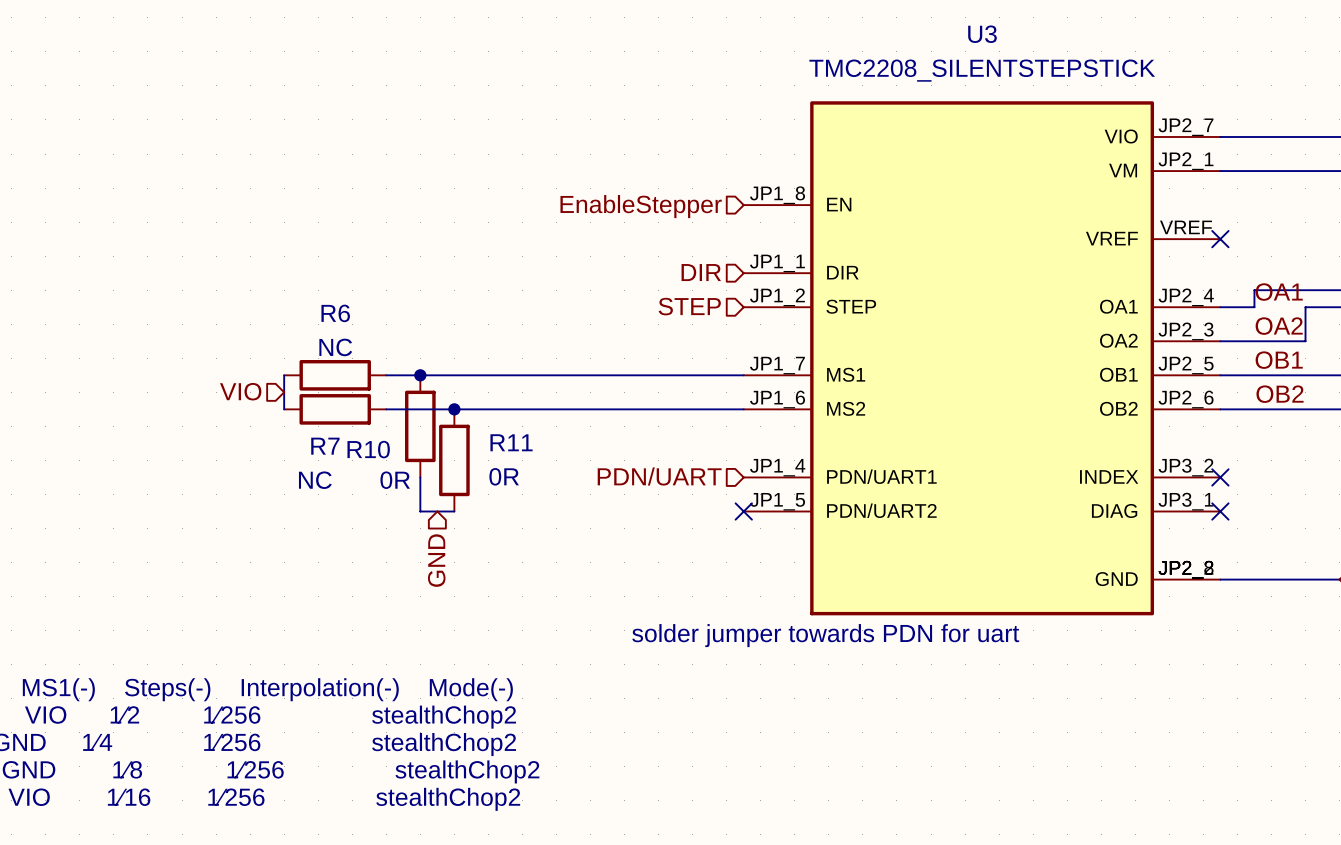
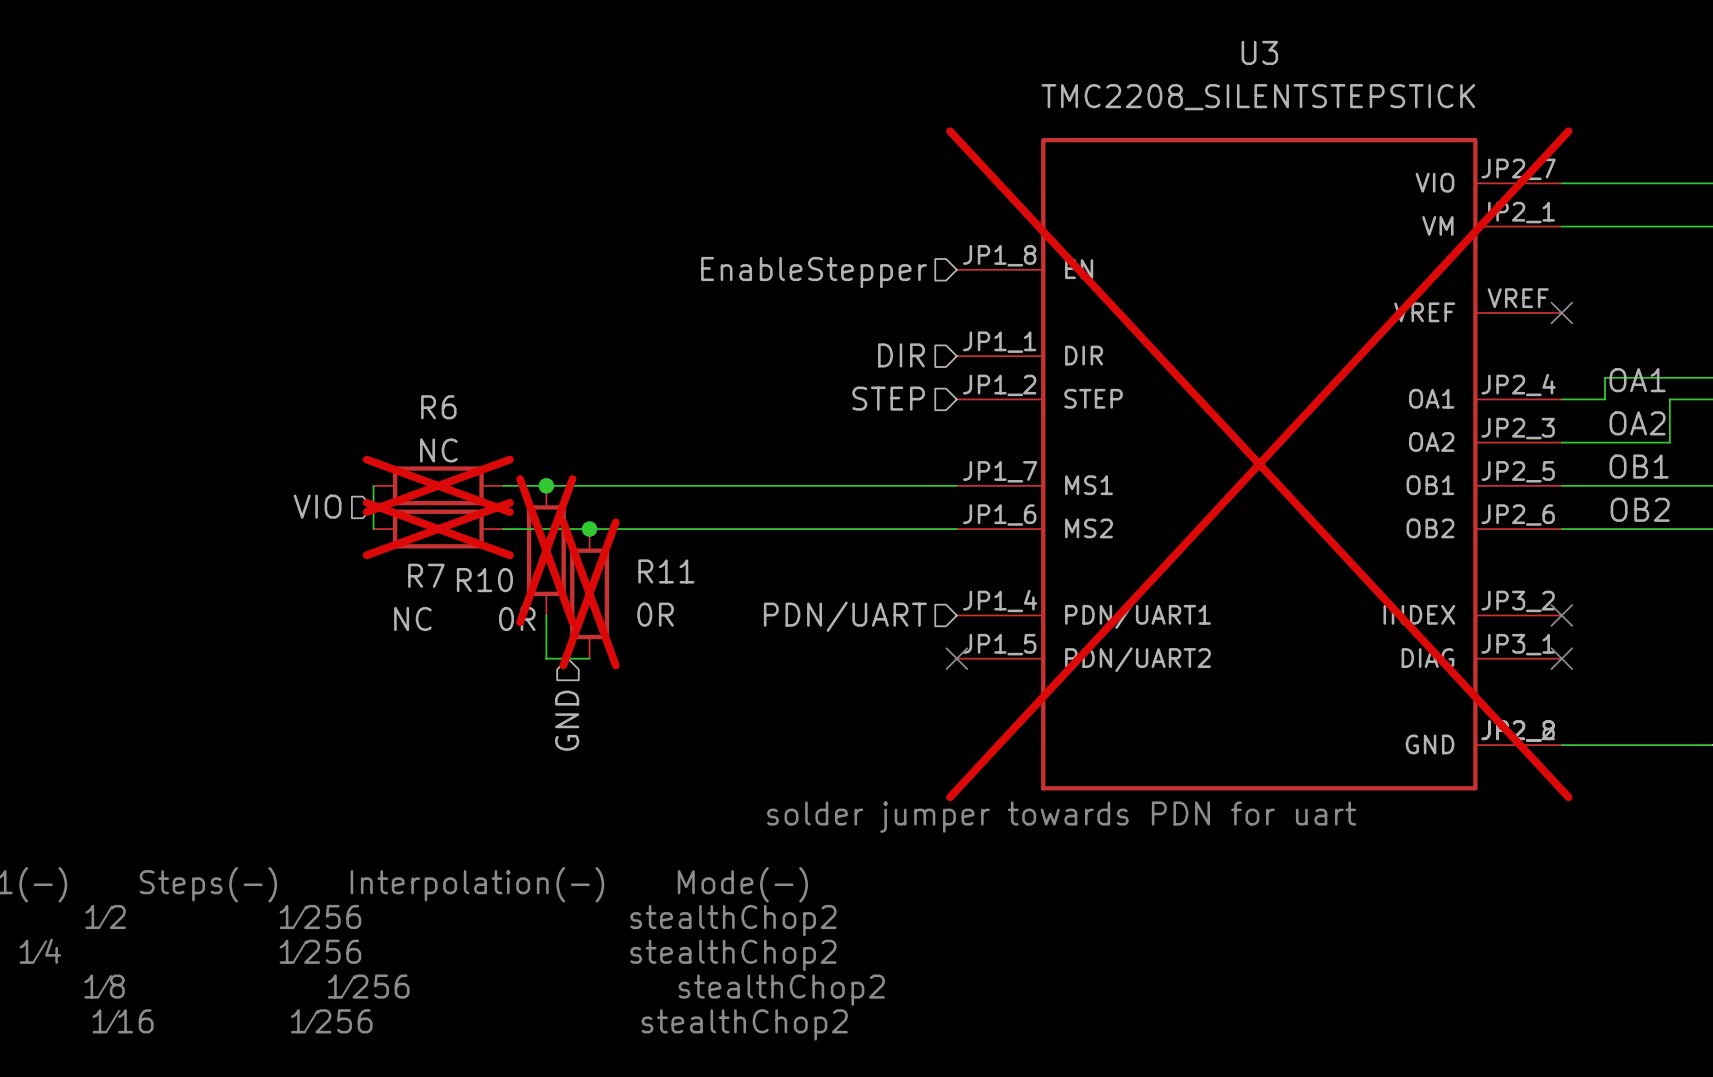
U3 do-not-place cross: none -> (1259, 464)
R6 do-not-place cross: none -> (438, 485)
R7 do-not-place cross: none -> (438, 529)
R10 do-not-place cross: none -> (546, 550)
R11 do-not-place cross: none -> (589, 593)

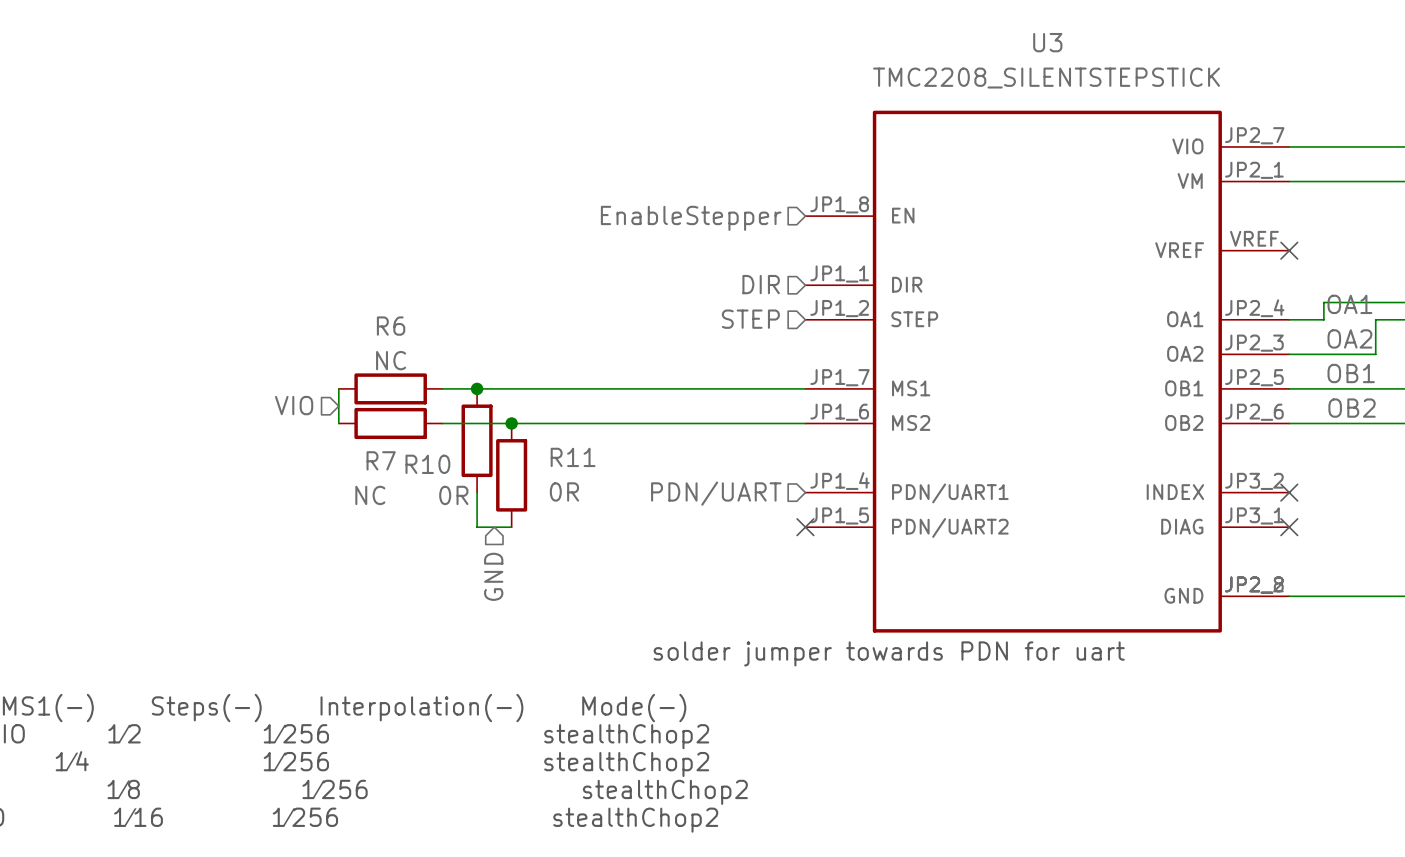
U3 do-not-place cross: (1259, 464) -> none
R6 do-not-place cross: (438, 485) -> none
R7 do-not-place cross: (438, 529) -> none
R10 do-not-place cross: (546, 550) -> none
R11 do-not-place cross: (589, 593) -> none

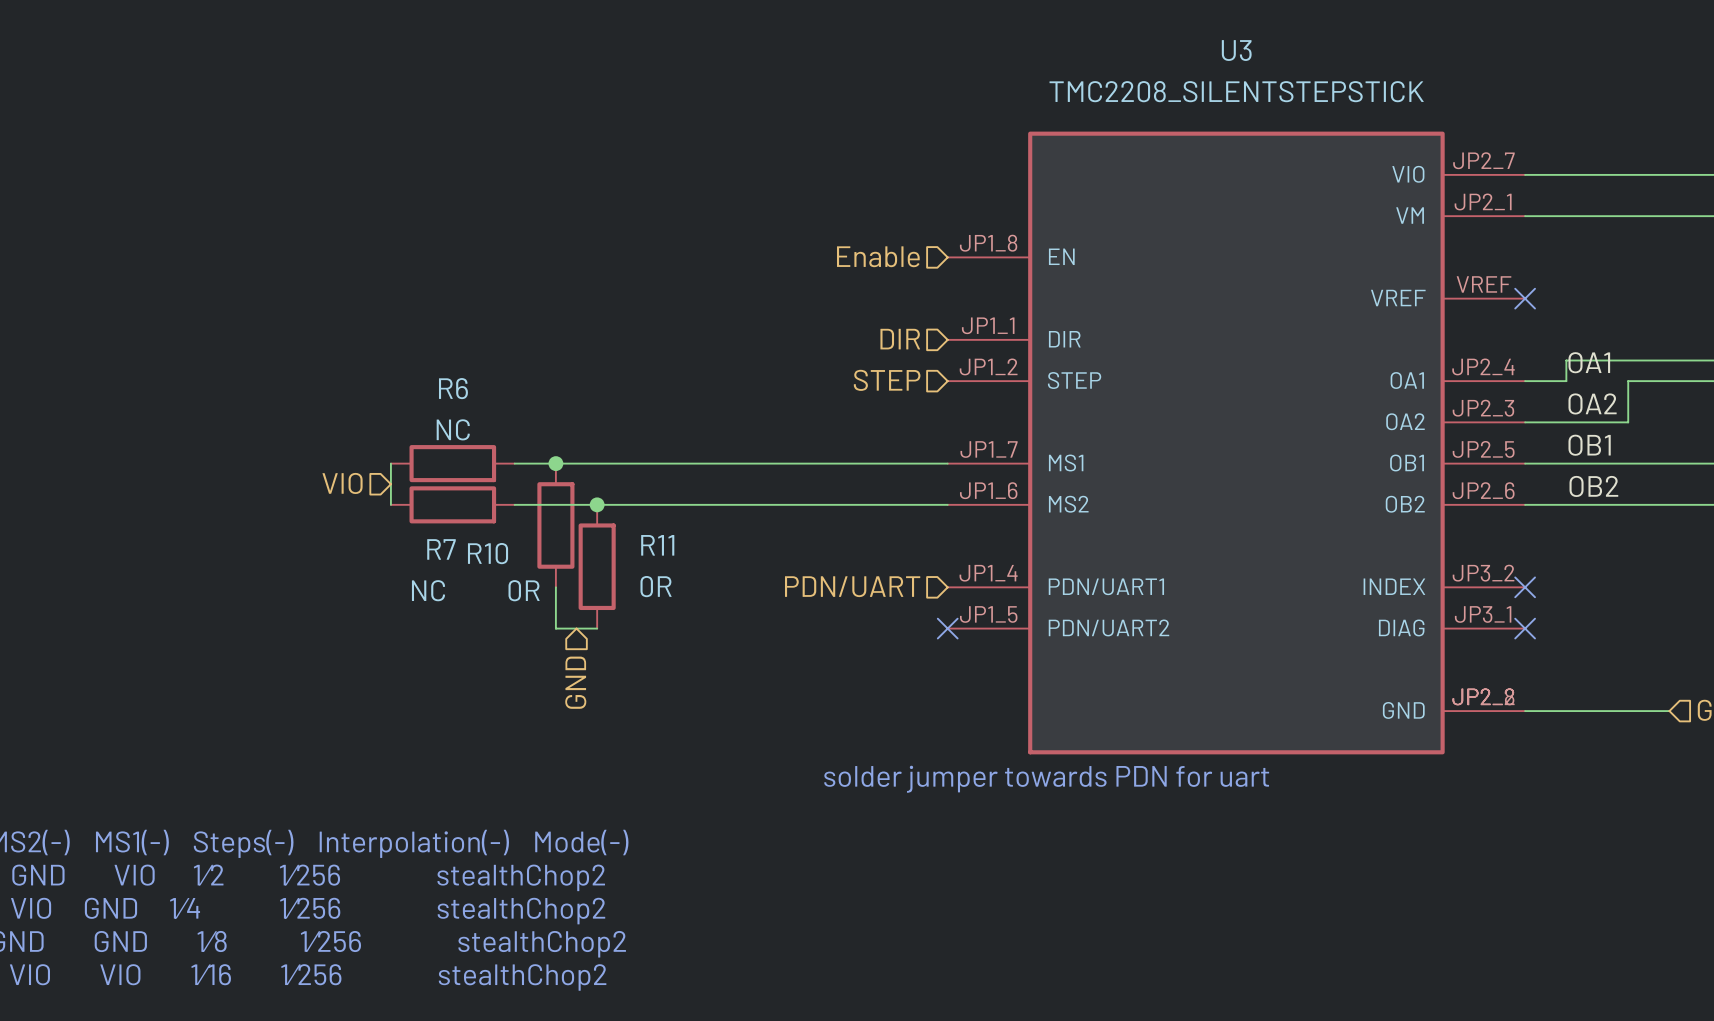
hierarchical label: EnableStepper (691, 218) -> Enable (878, 256)

